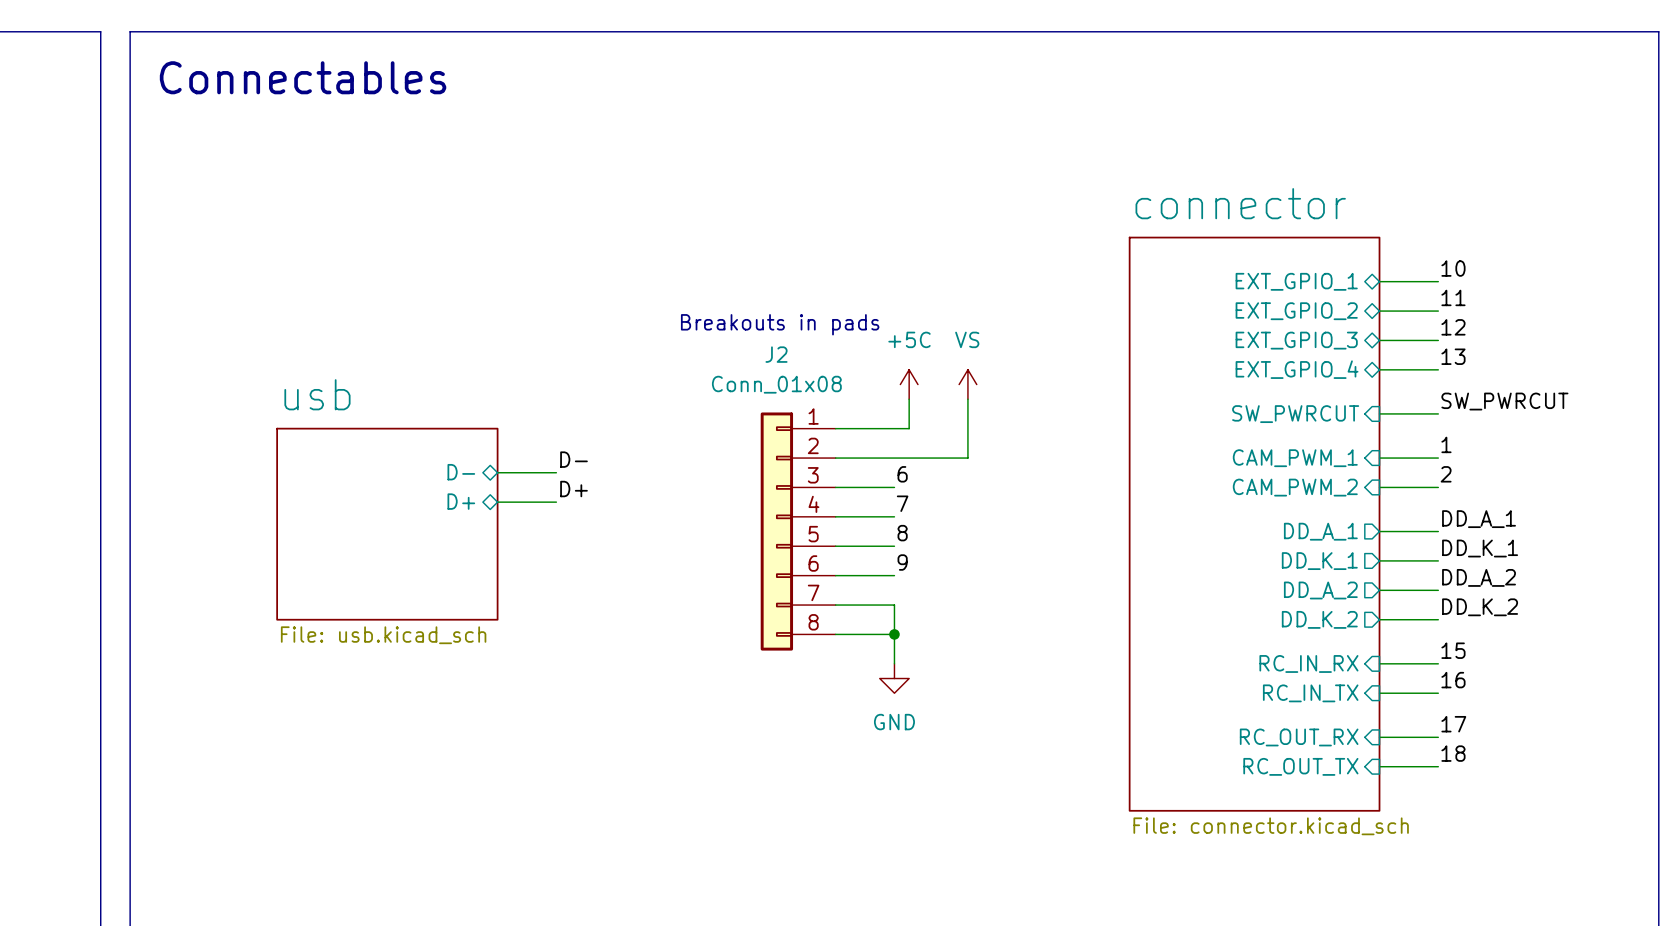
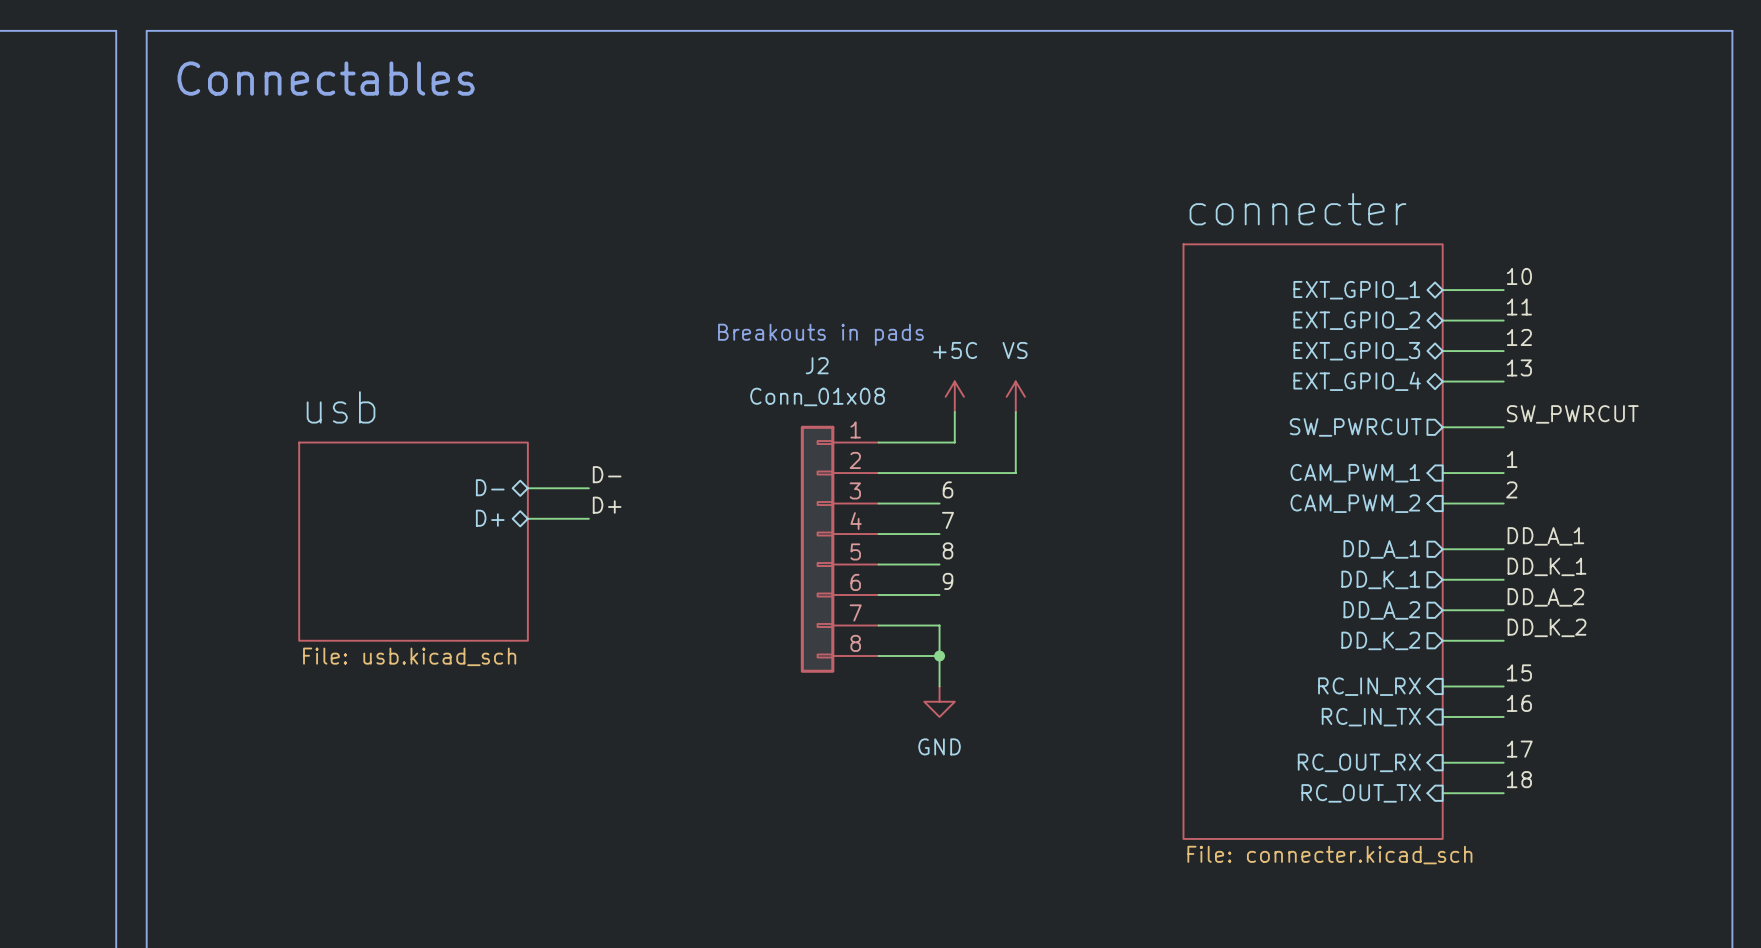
sheet connector name: connector (1240, 203) -> connecter (1297, 209)
sheet pin shape: input (1295, 414) -> output (1355, 427)
sheet connector value: File: connector.kicad_sch (1271, 826) -> File: connecter.kicad_sch (1329, 855)

